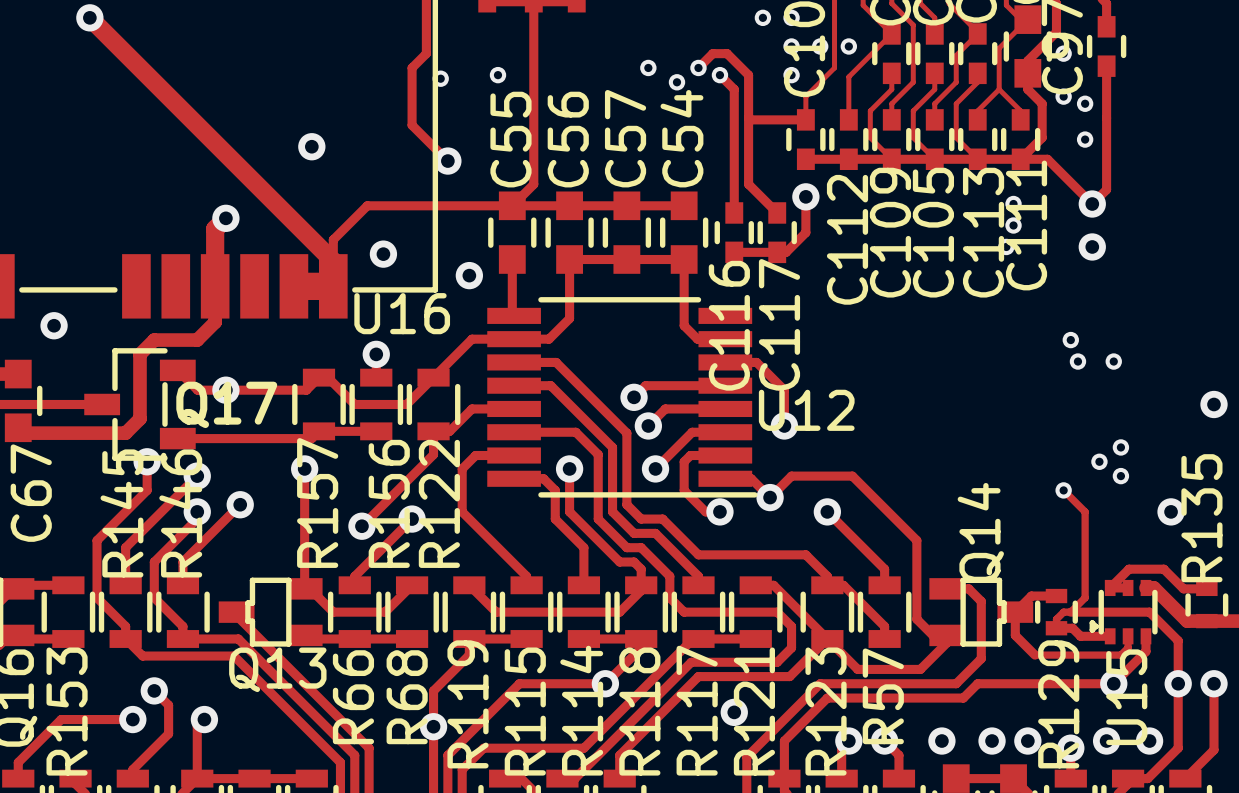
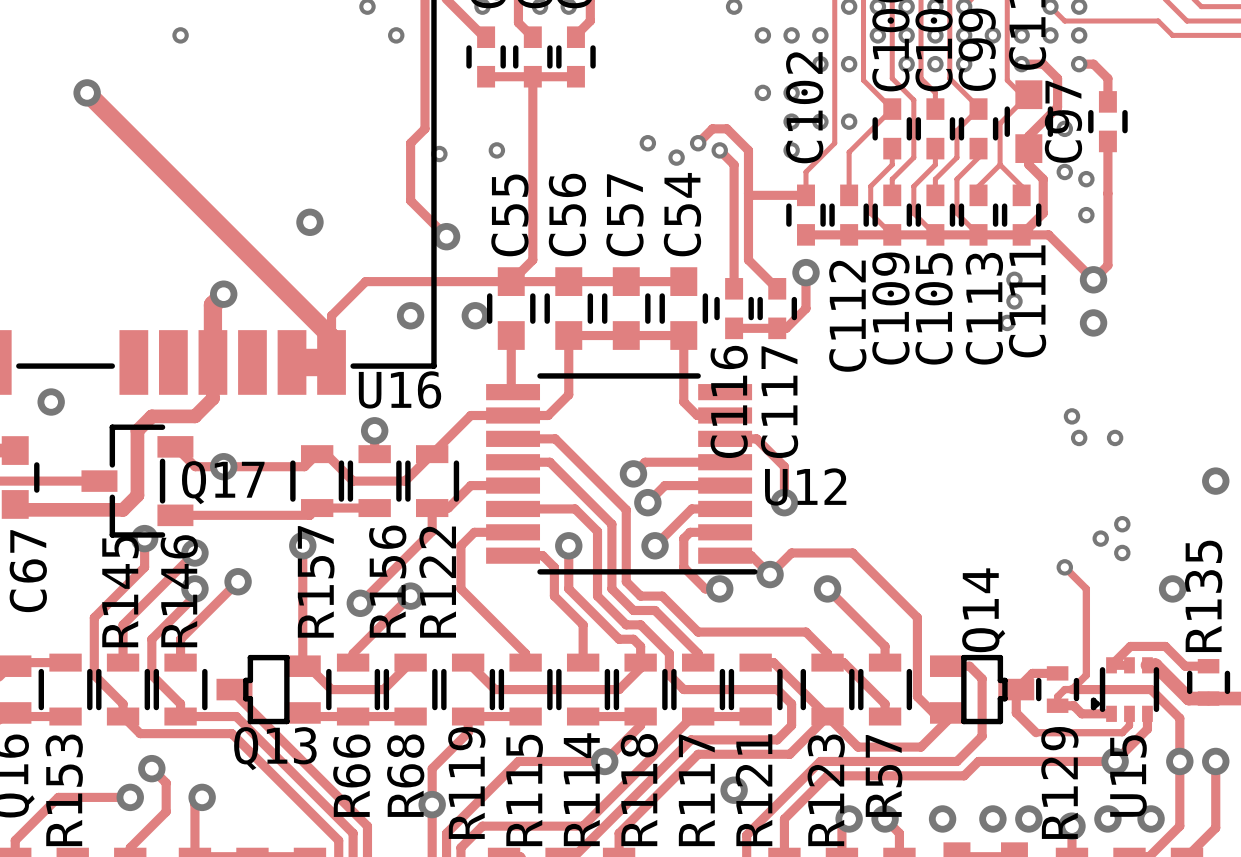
via: none -> (475, 315)
via position: (383, 254) -> (410, 315)
via: (469, 275) -> none

